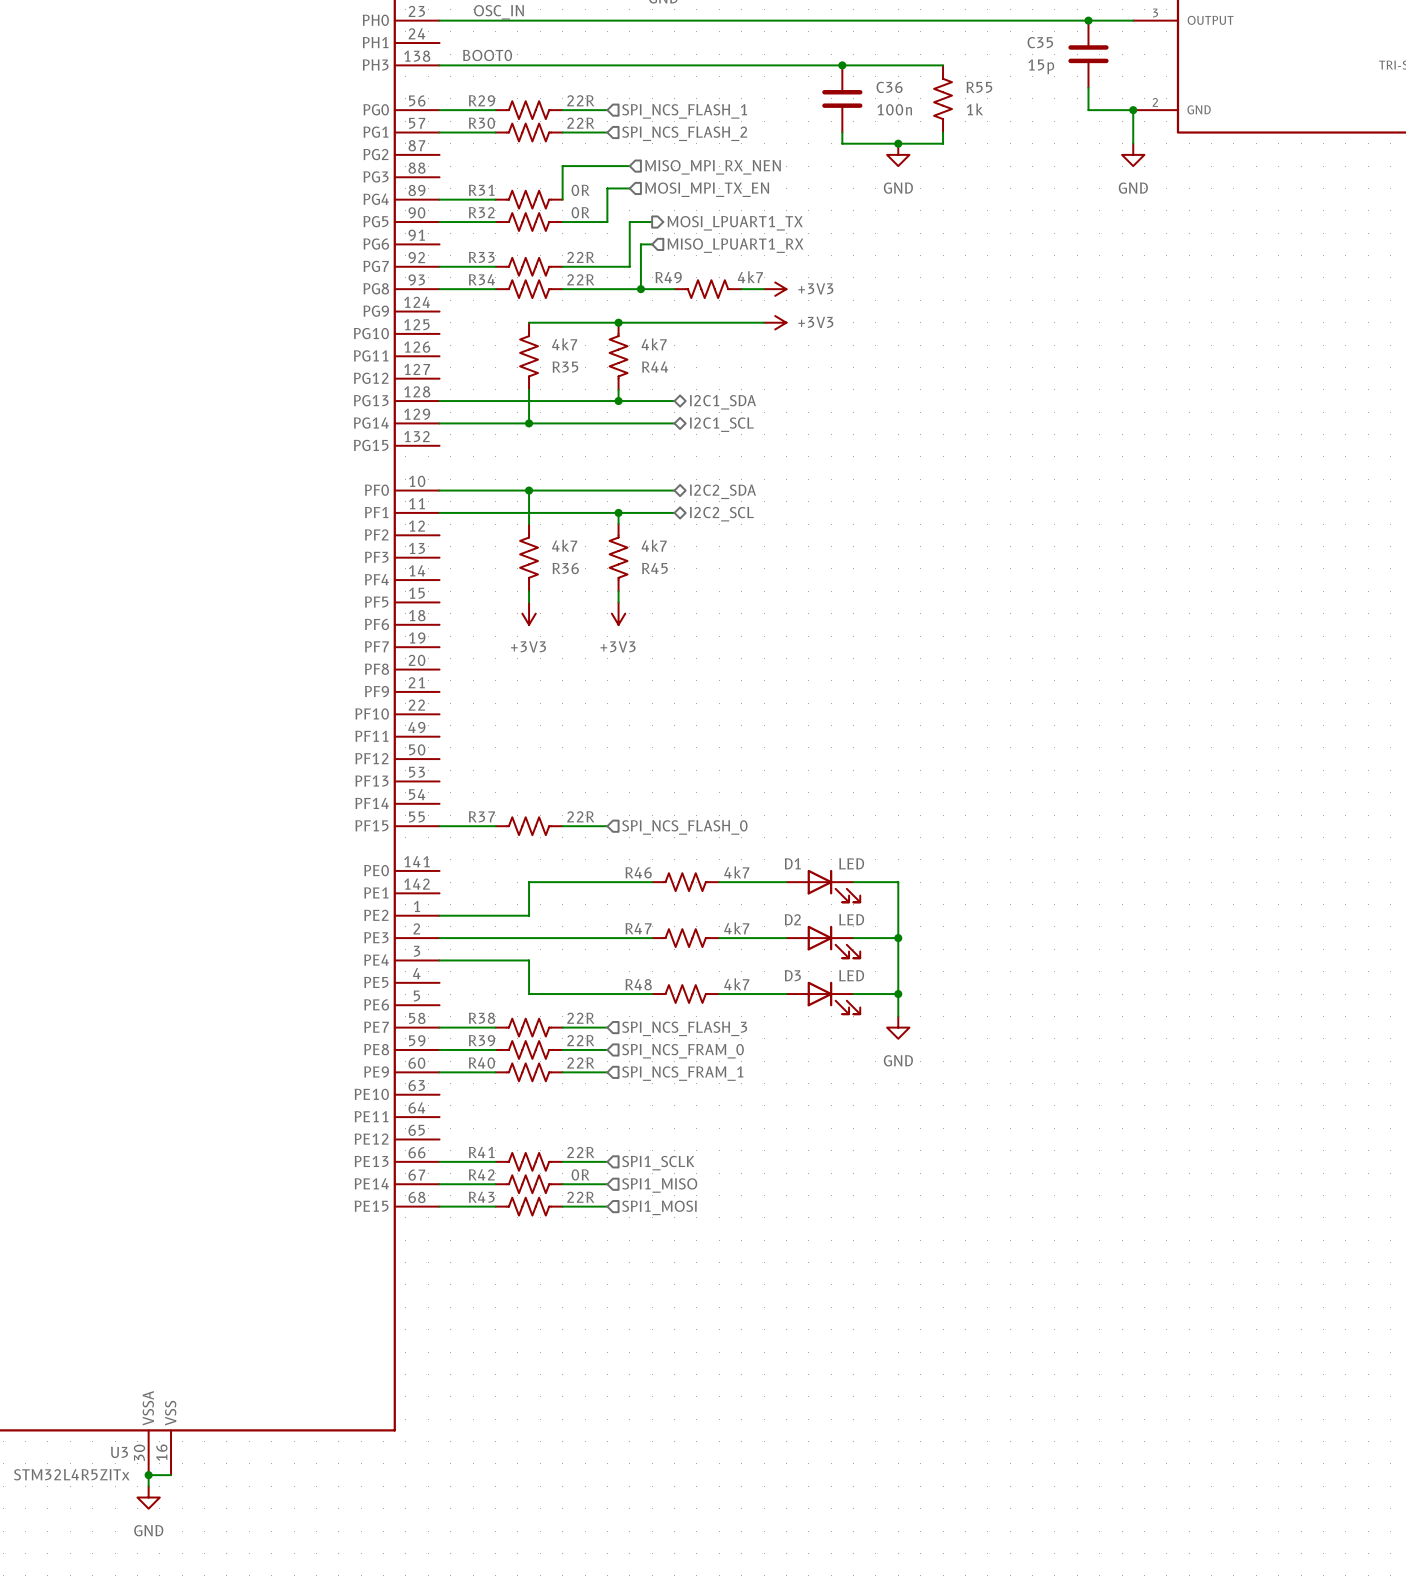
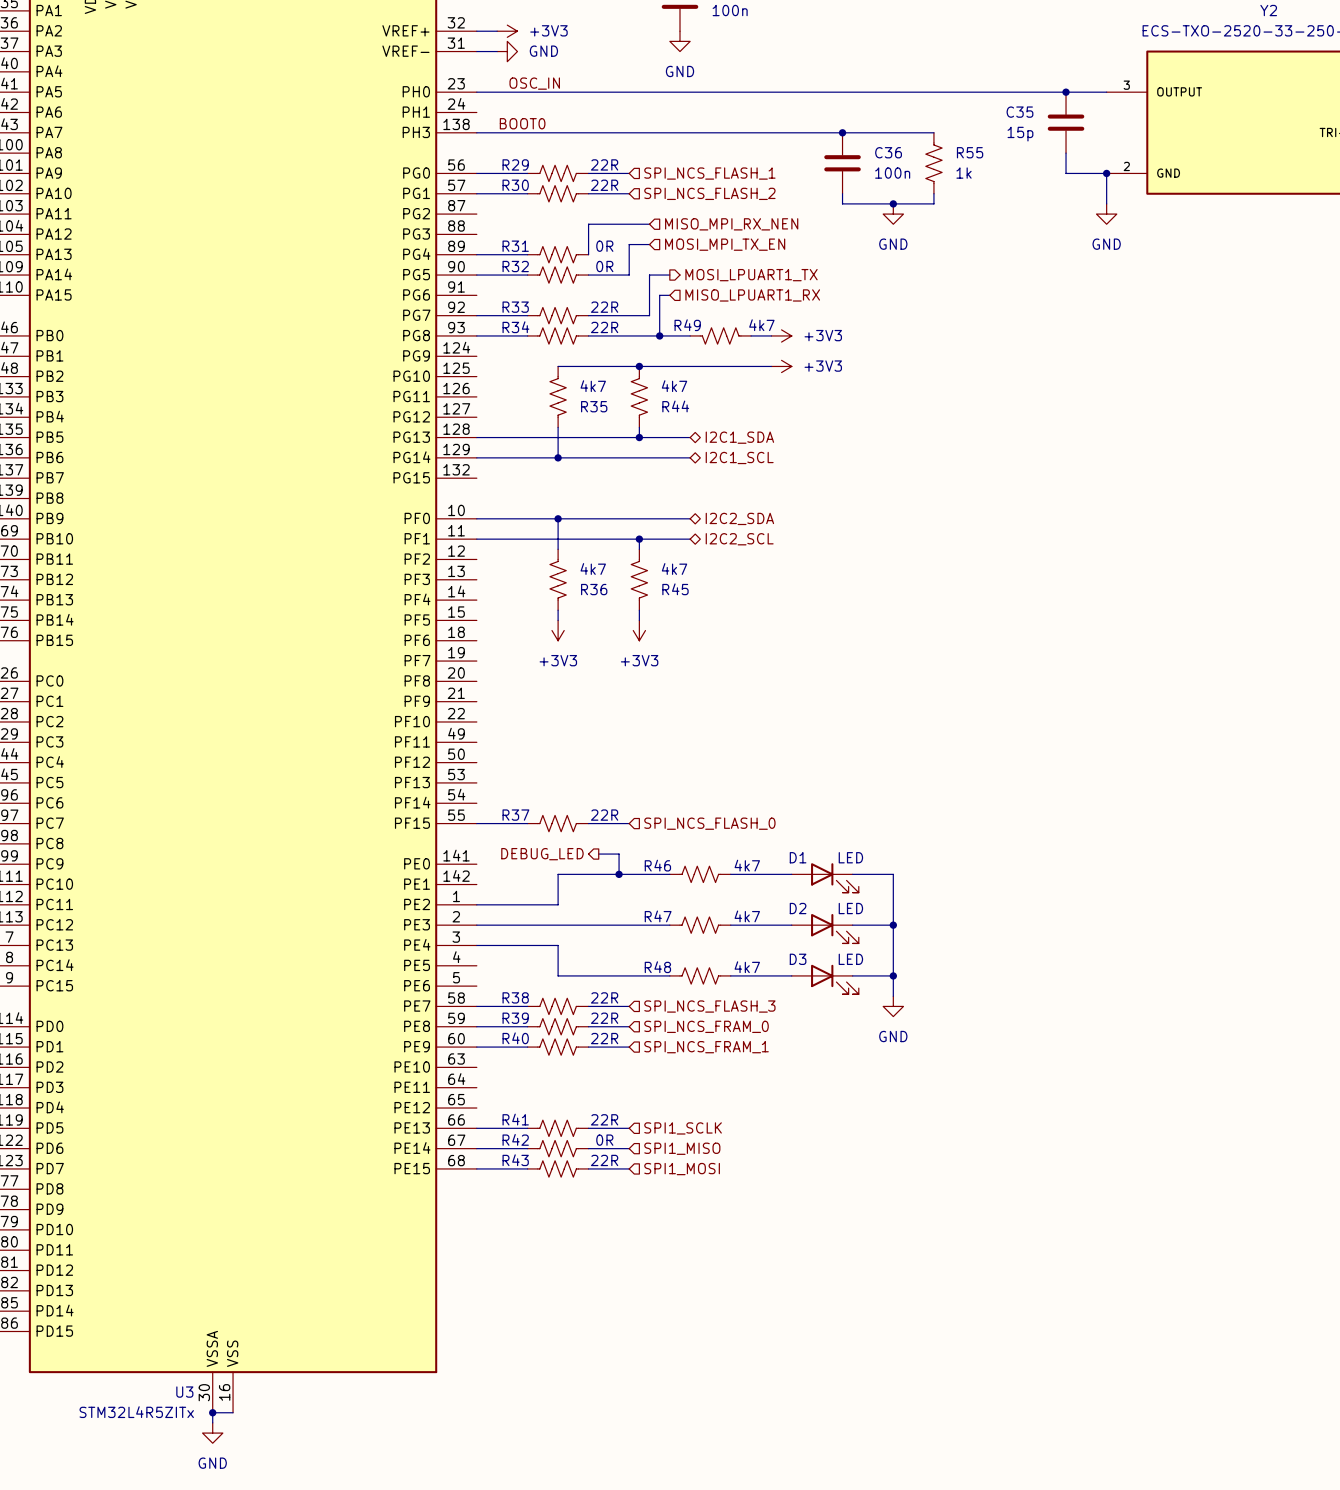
wire: none -> (598, 854) (619, 854) (619, 874)
hierarchical label: none -> DEBUG_LED (542, 854)
junction: none -> (619, 874)

